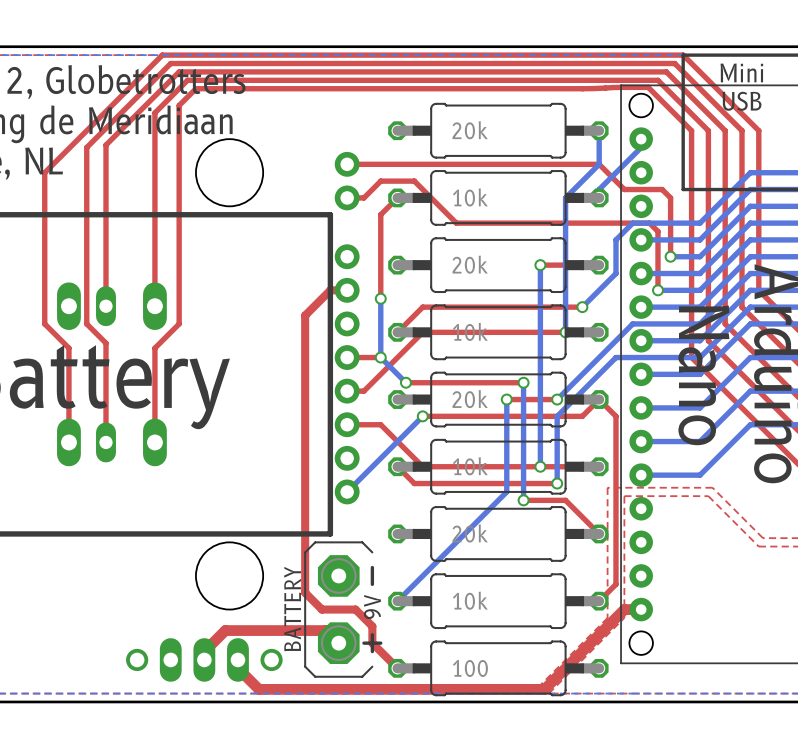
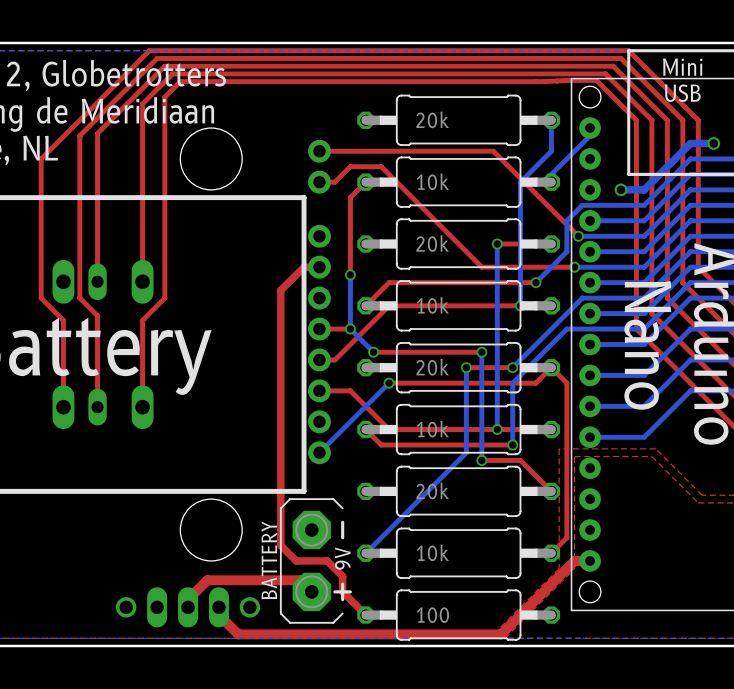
bottom track: none -> (713, 143) (690, 143) (644, 189) (620, 189)
via: none -> (713, 143)
top track: (536, 164) (599, 164) (624, 189) (662, 189) (670, 197) (670, 256) -> (493, 151) (578, 236)
via: none -> (620, 189)
top track: (456, 223) (649, 223) (657, 231) (657, 290) -> (419, 205) (481, 267) (574, 267)
via: none -> (578, 236)
bottom track: none -> (617, 236) (578, 236)
via: (670, 256) -> none
via: none -> (574, 267)
bottom track: none -> (605, 267) (574, 267)
via: (657, 290) -> none

